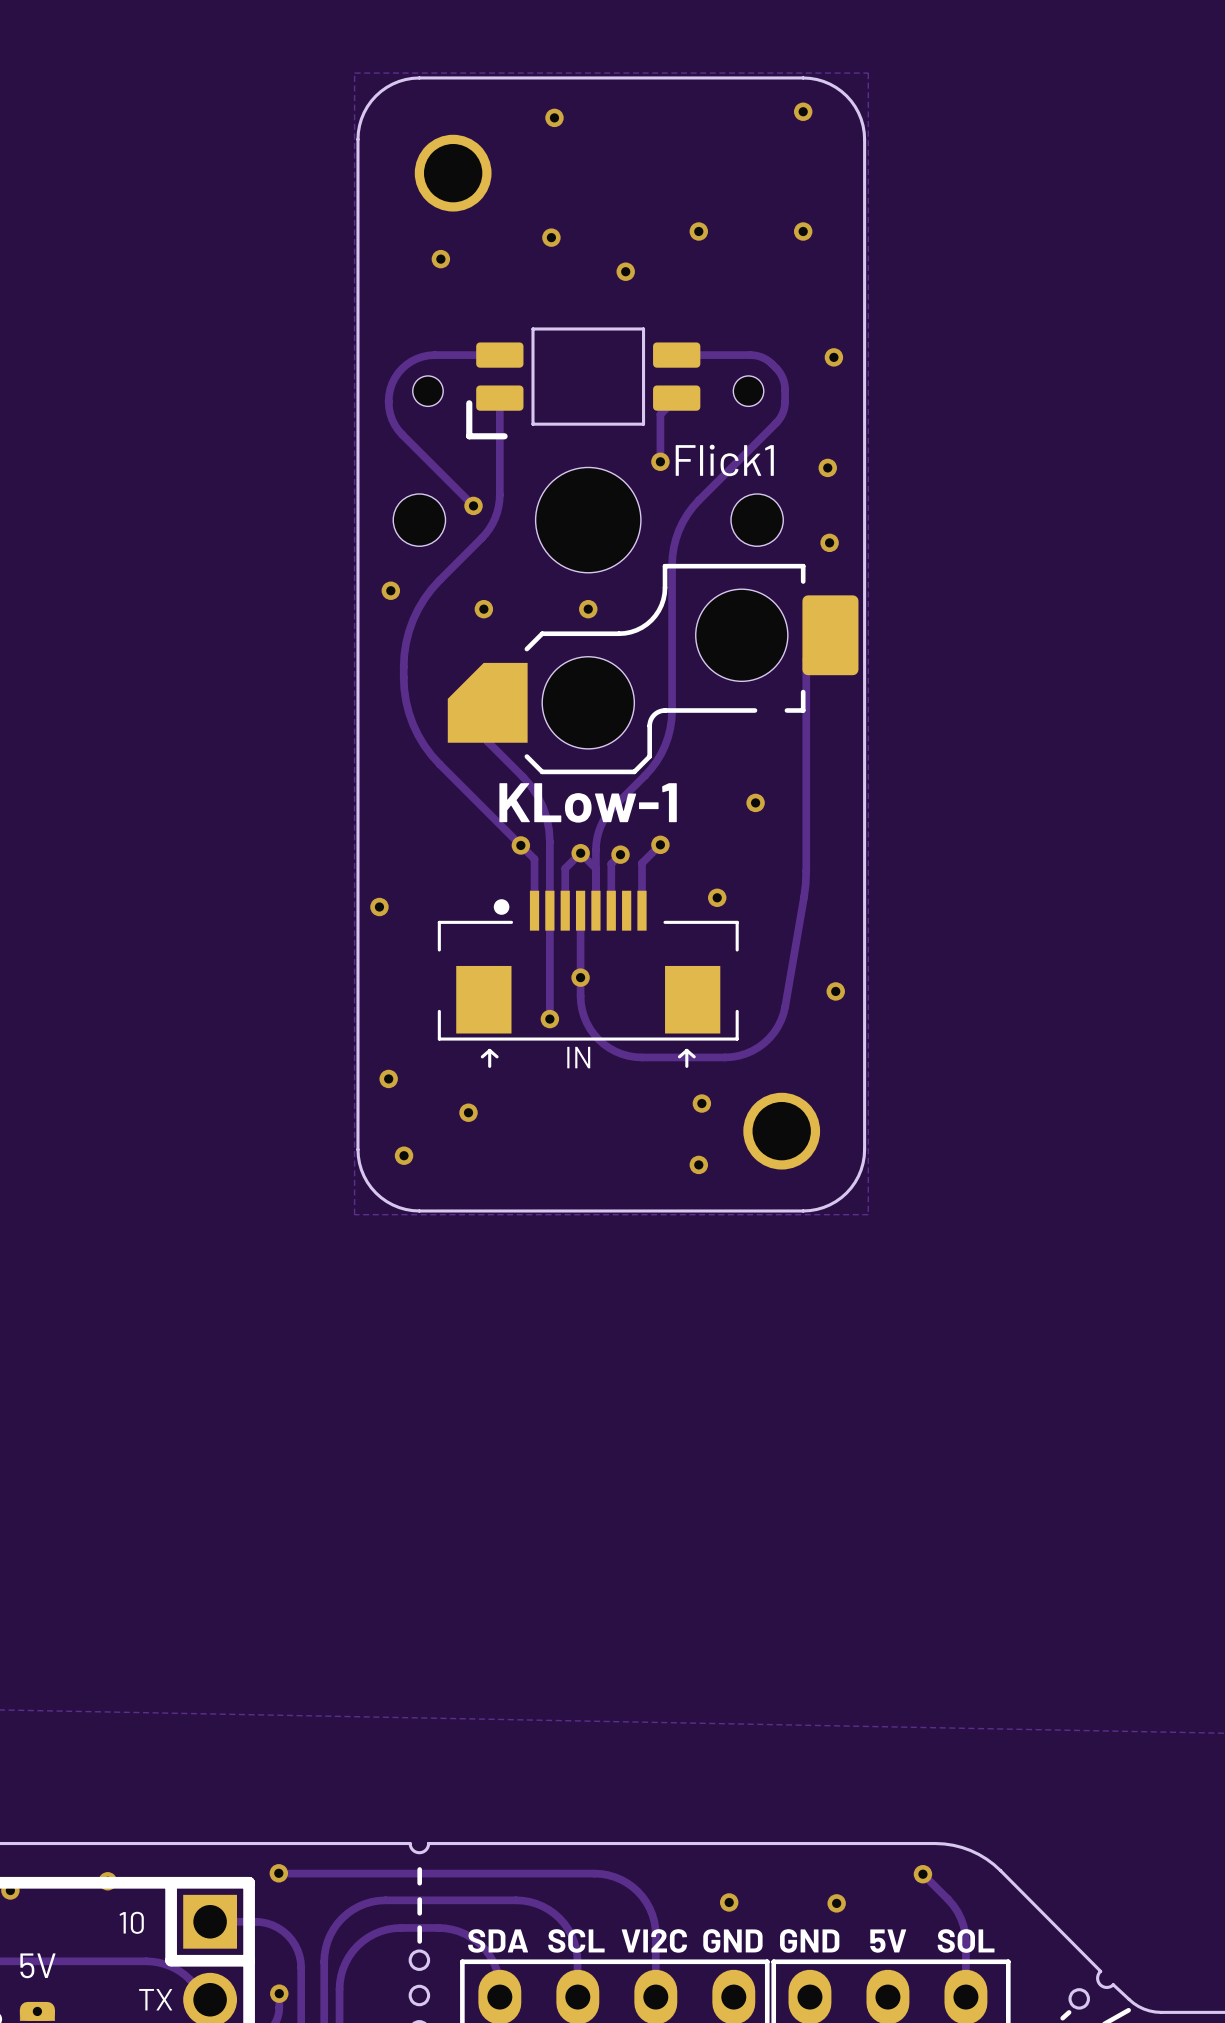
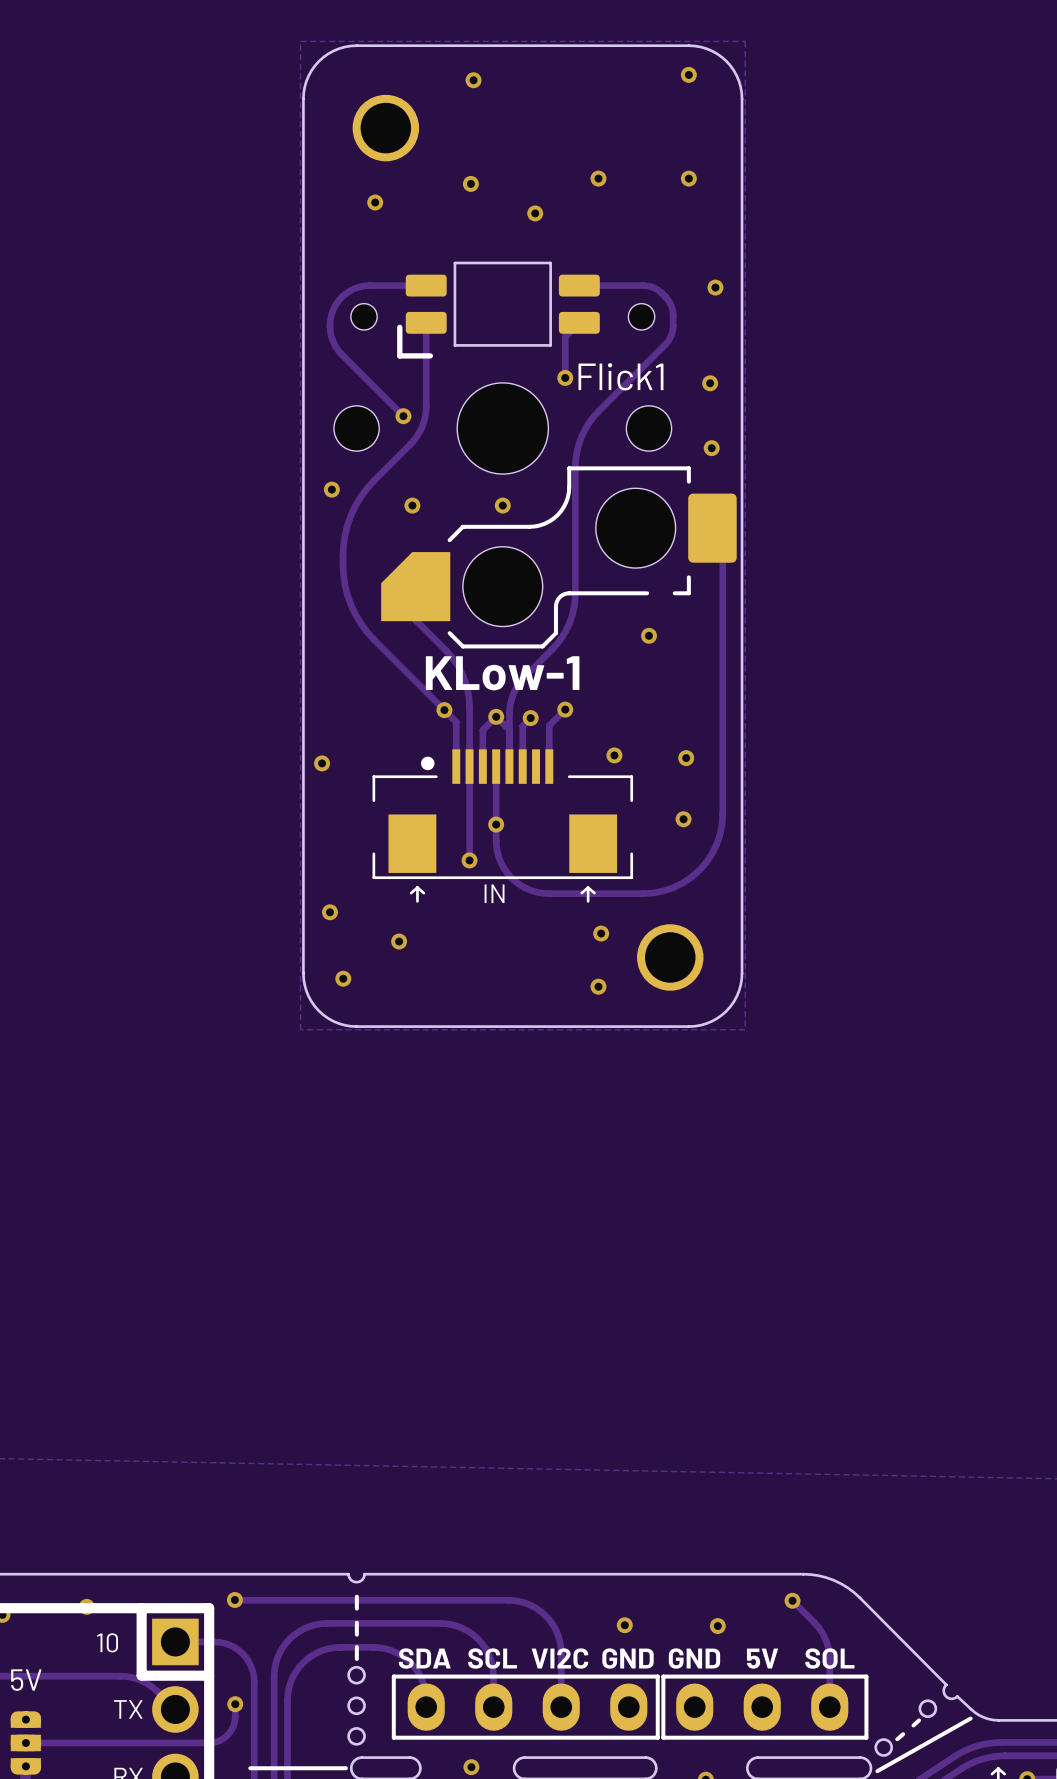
track: (830, 635) (806, 659) (805, 884) (783, 1013) (774, 1032) (758, 1047) (738, 1055) (724, 1057) -> (722, 528) (722, 813) (720, 834) (706, 862) (682, 882) (653, 892) (620, 893)
via position: (755, 802) -> (648, 635)
via: none -> (686, 758)
via position: (835, 991) -> (683, 819)

